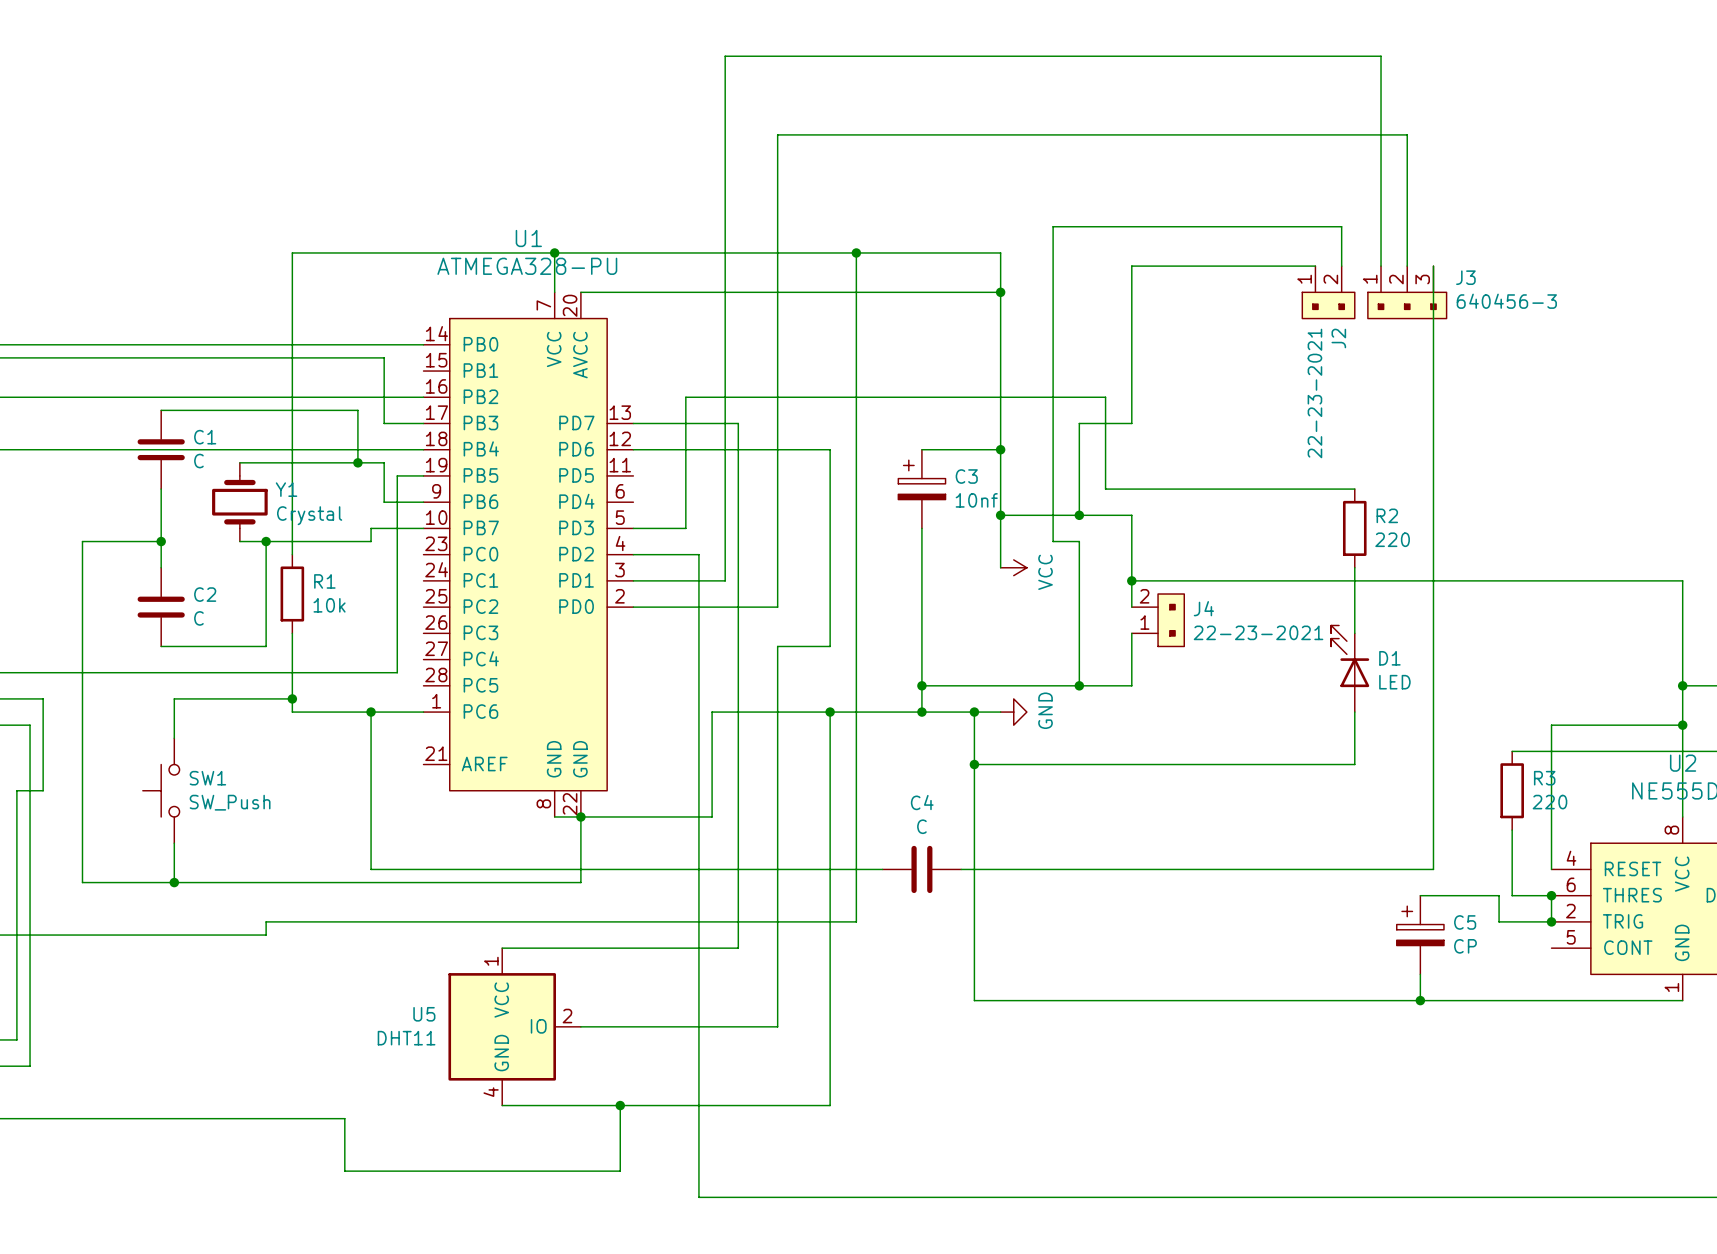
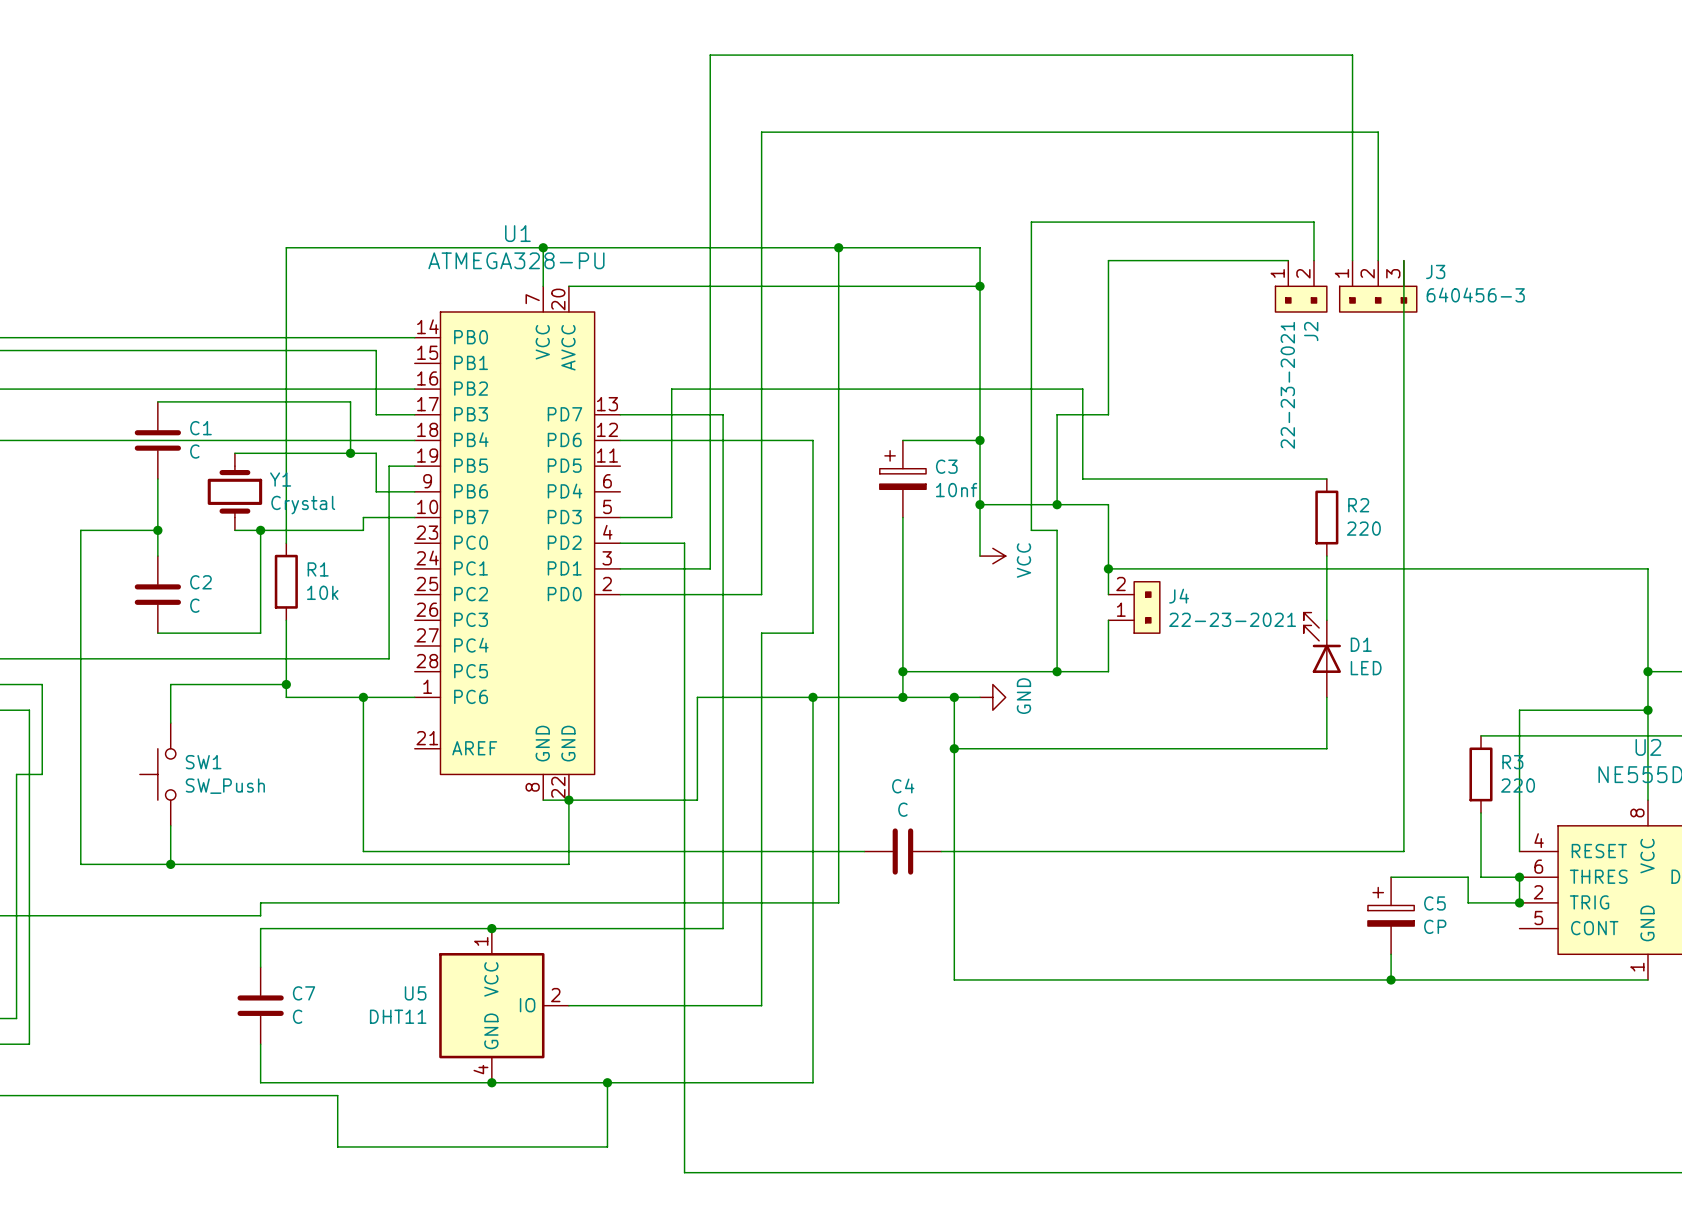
wire: none -> (491, 928) (260, 928) (260, 967)
junction: none -> (491, 928)
C7: none -> C (260, 1005)
wire: none -> (260, 1044) (260, 1082) (491, 1082)
junction: none -> (491, 1082)

